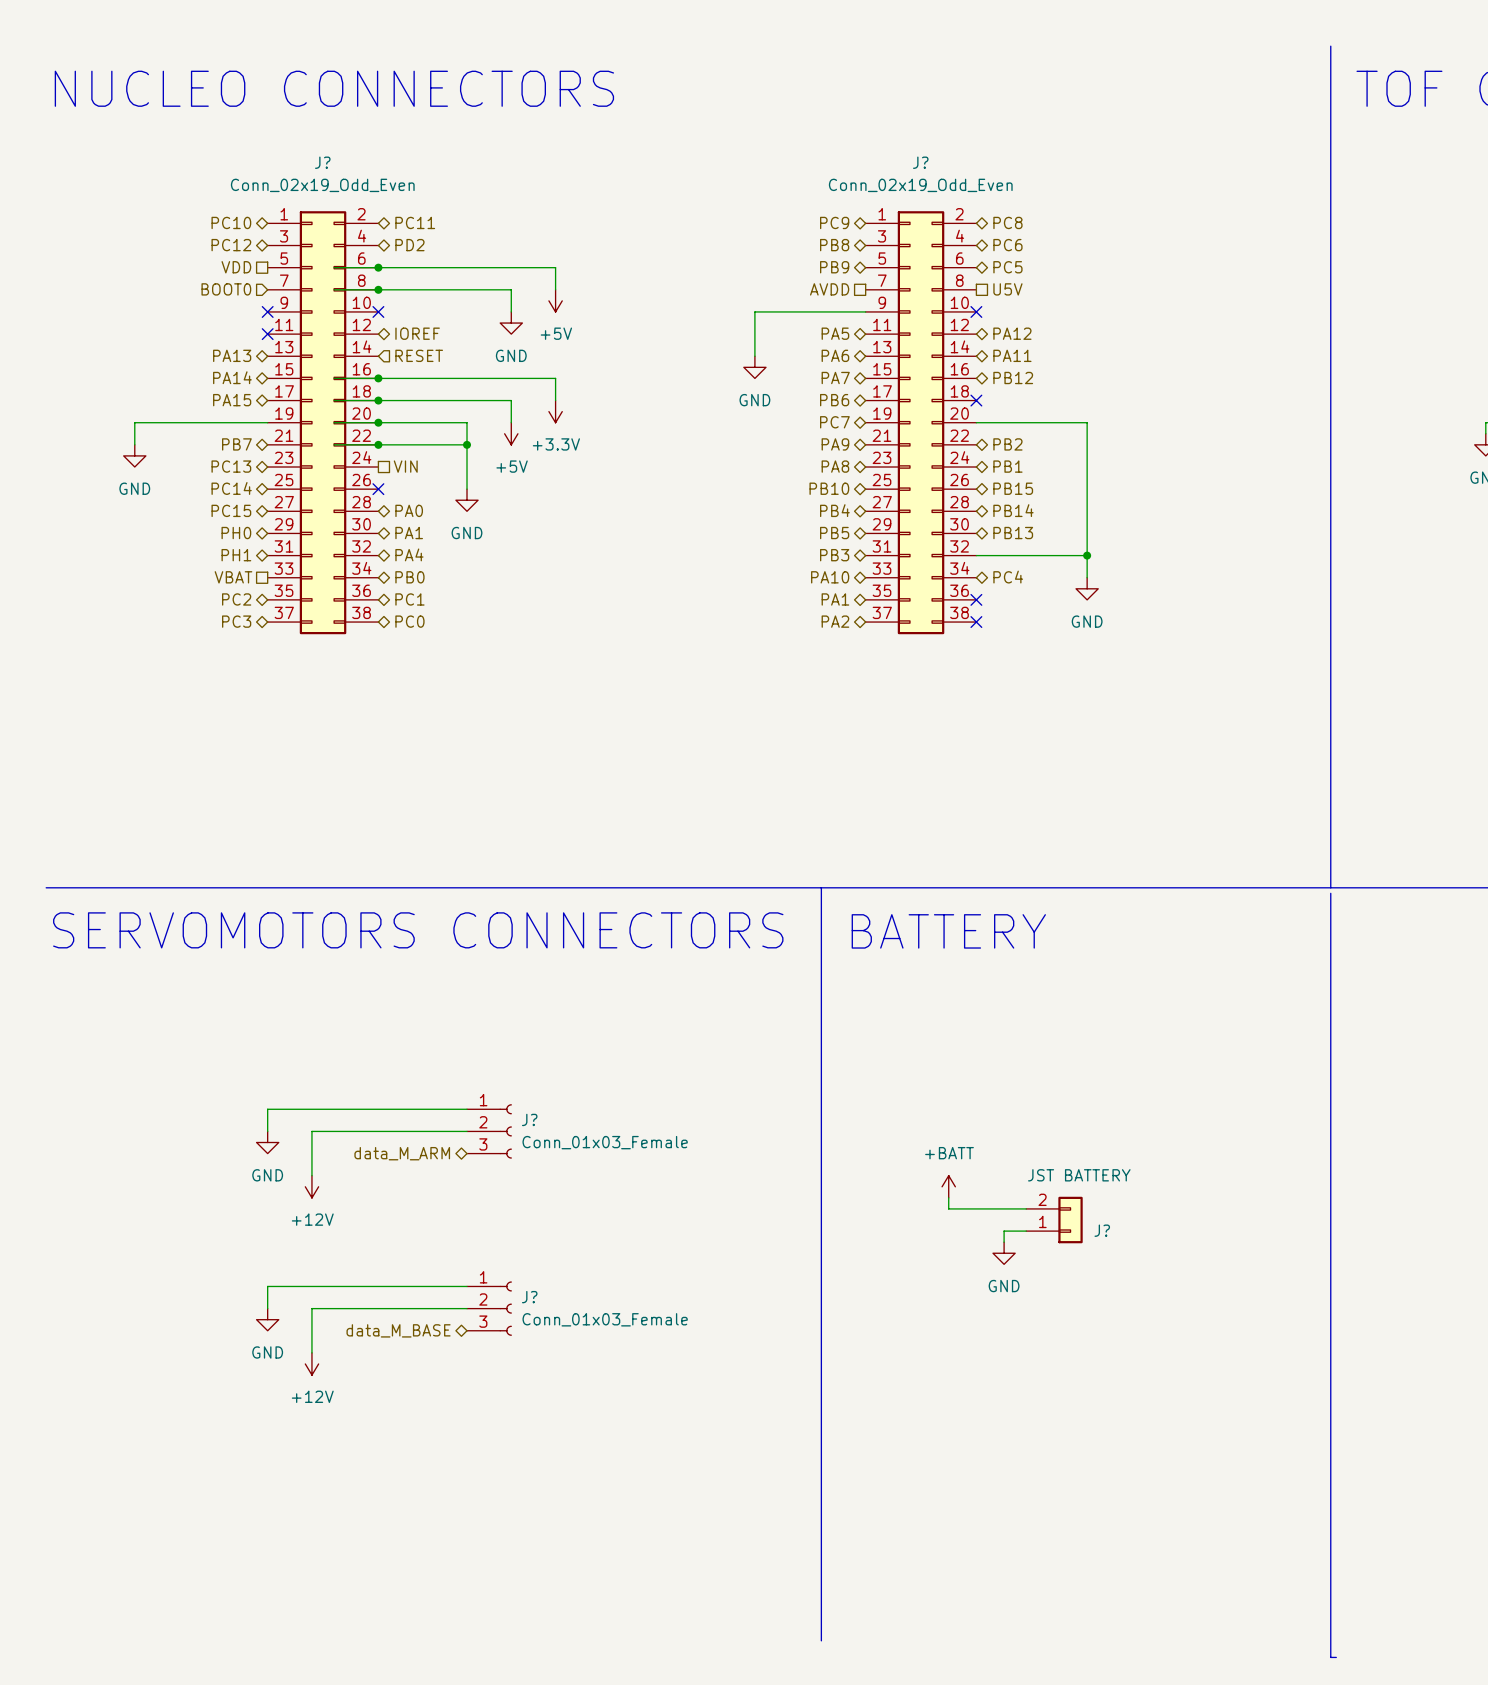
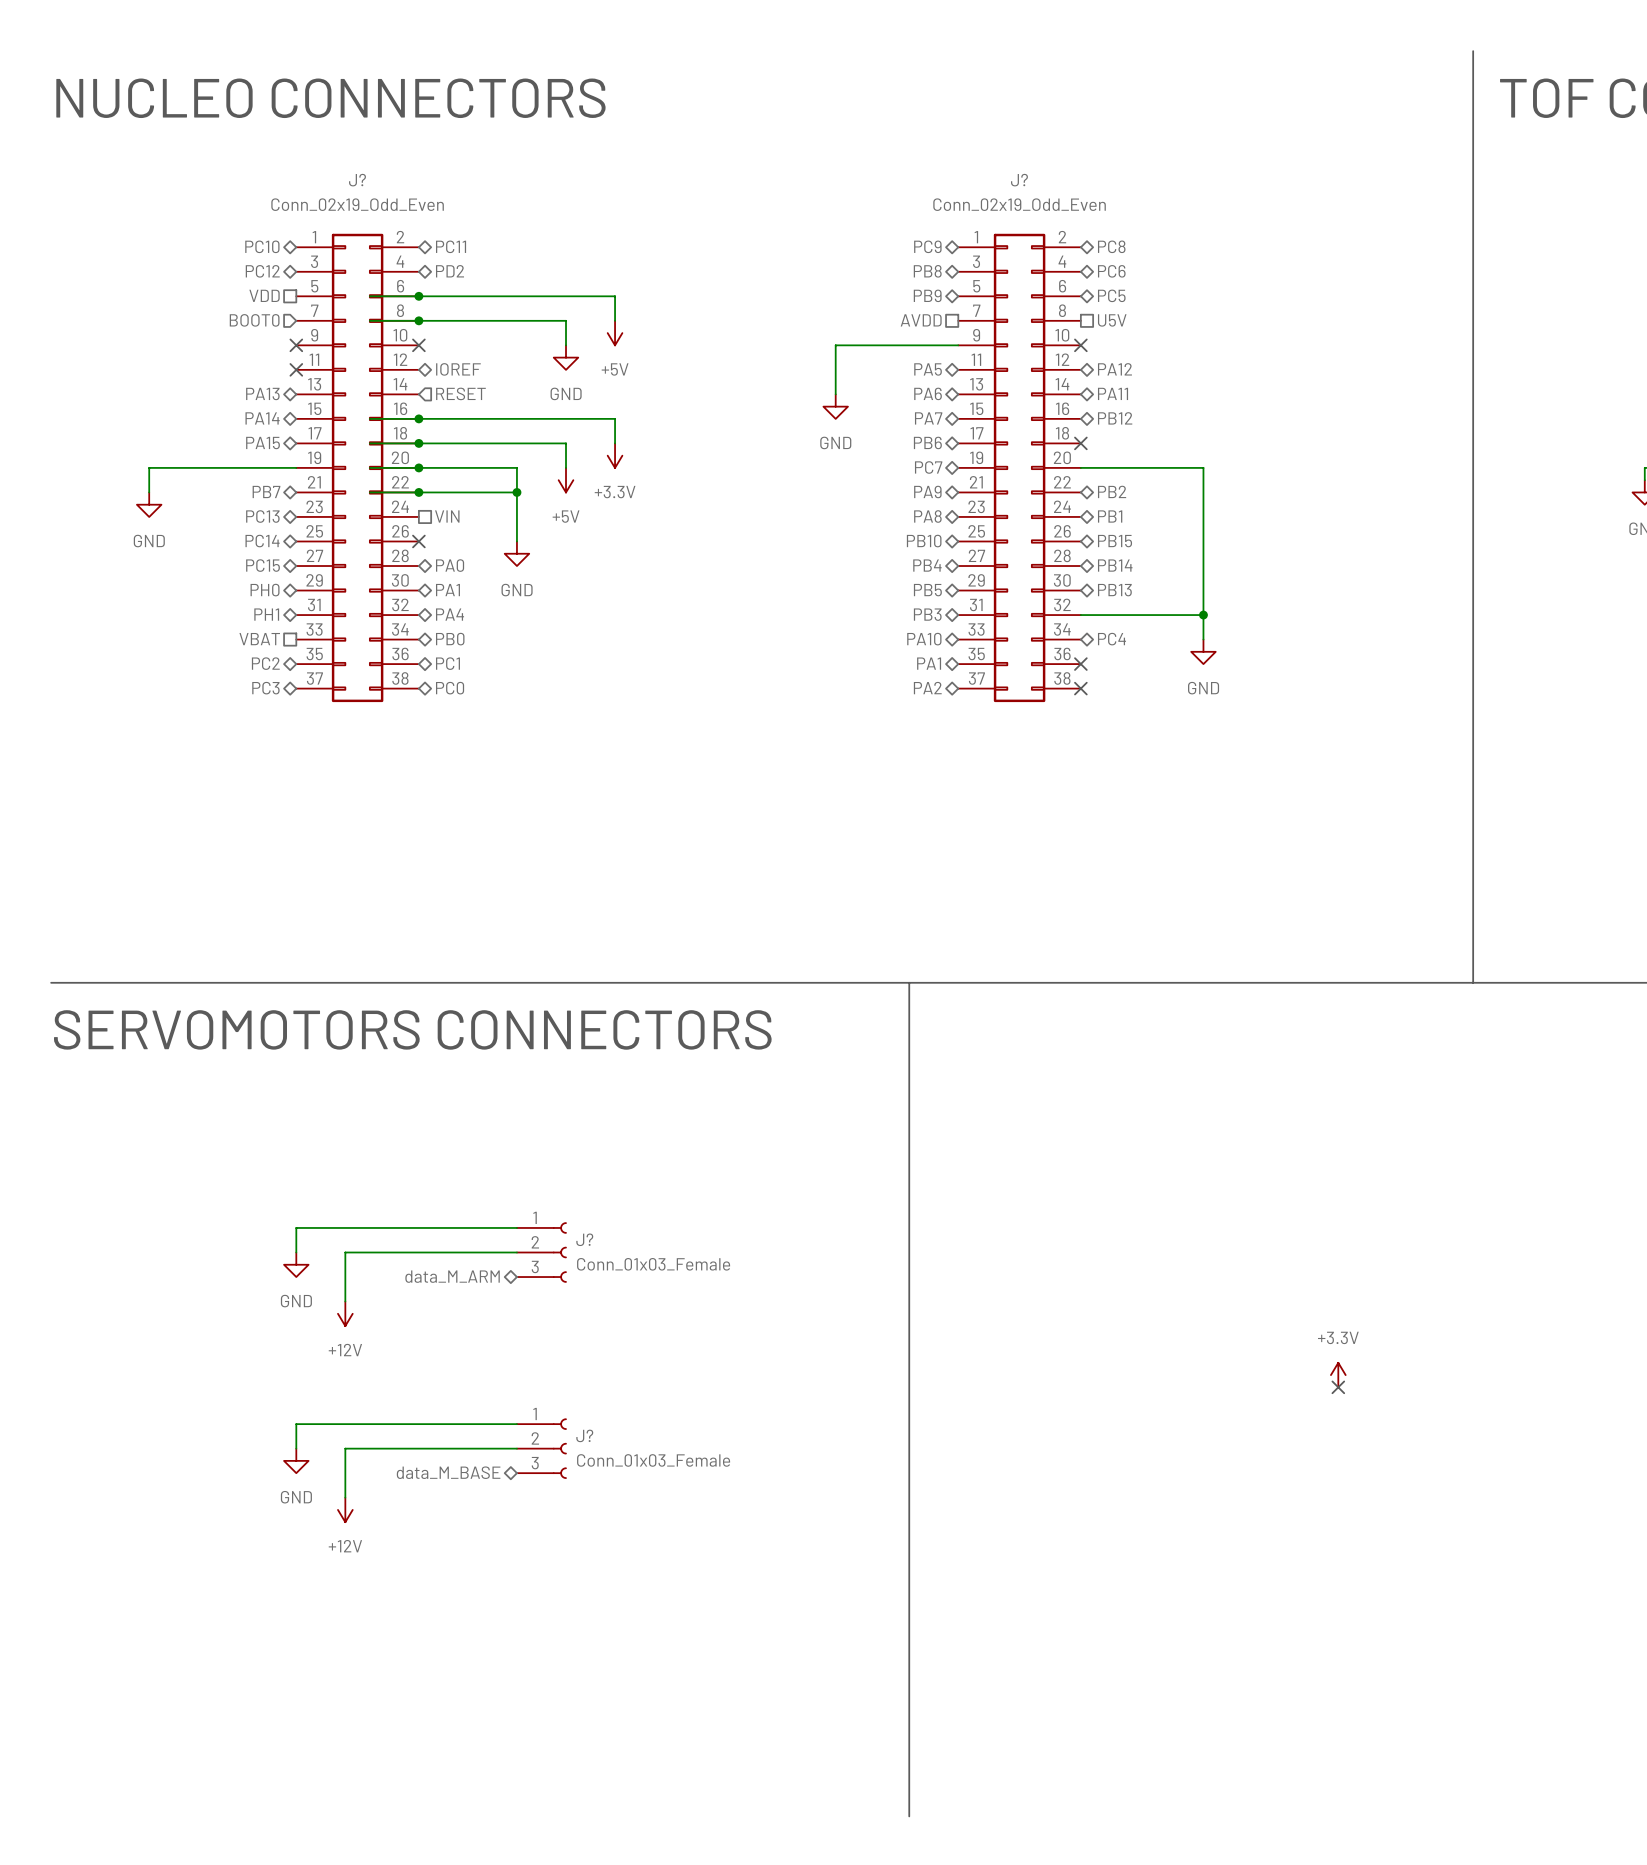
line: (1330, 893) (1330, 1657) (1336, 1657) -> none
text: BATTERY (948, 931) -> none
power symbol: +BATT (948, 1186) -> none
wire: (948, 1197) (948, 1208) (1026, 1208) -> none
J?: JST BATTERY (1054, 1220) -> none
wire: (1026, 1231) (1004, 1231) (1004, 1242) -> none
power symbol: none -> +3.3V (1338, 1375)
power symbol: GND (1004, 1253) -> none
no-connect mark: none -> (1338, 1387)

